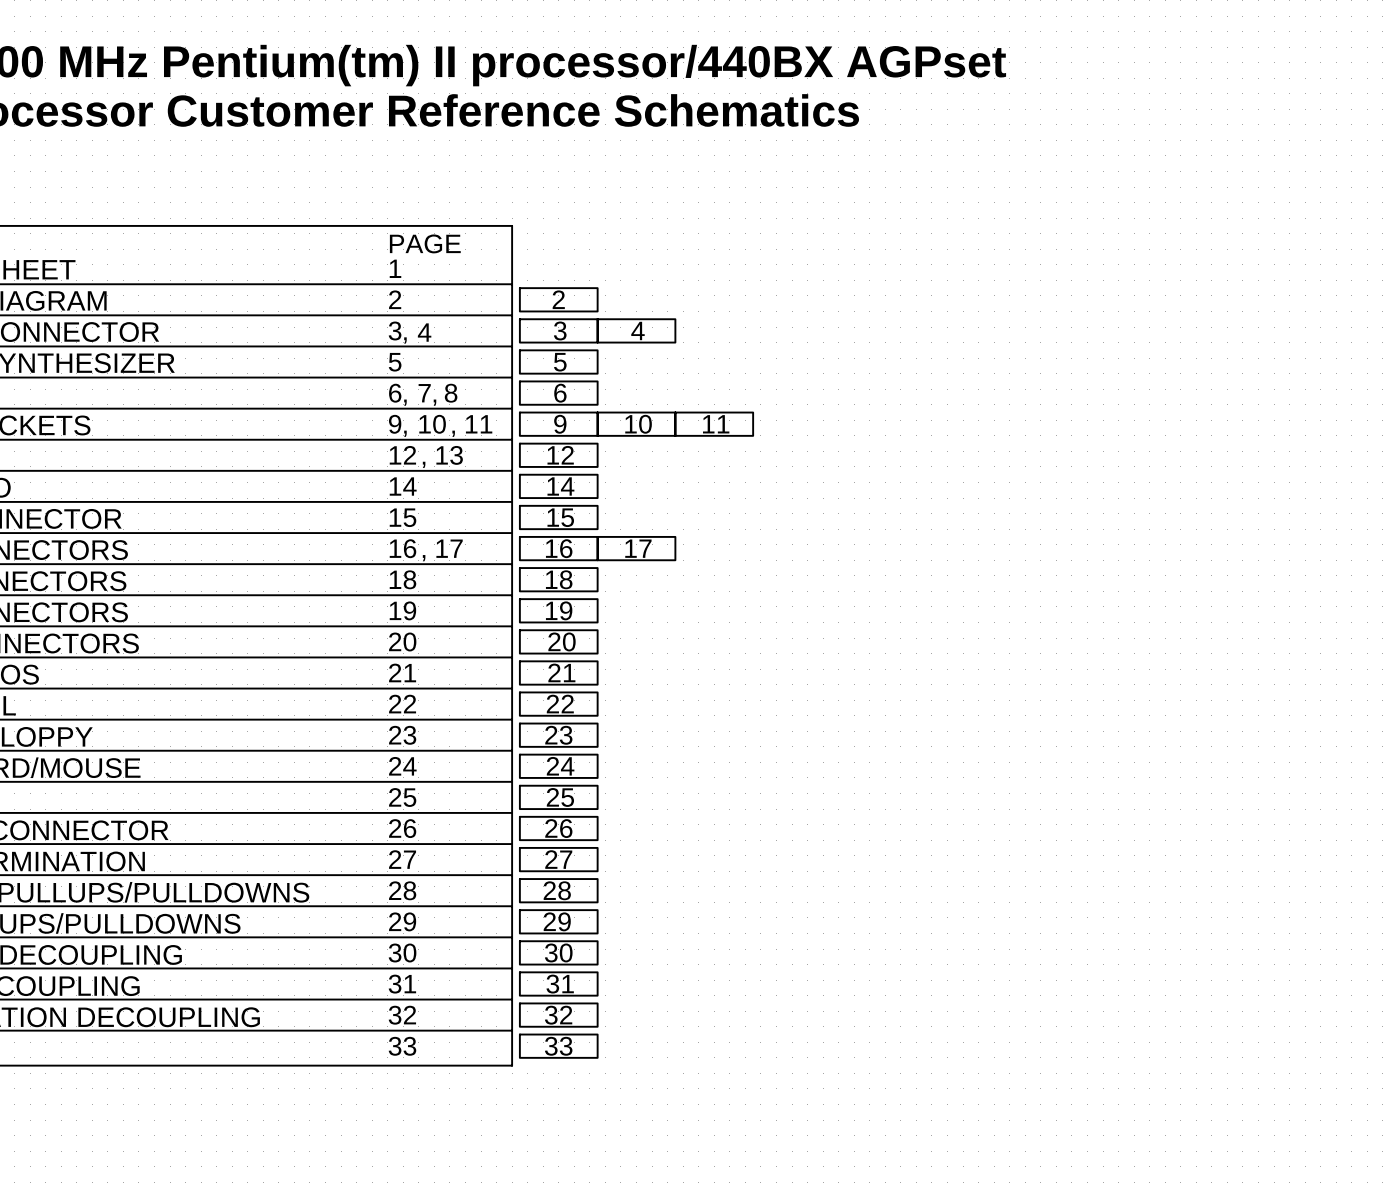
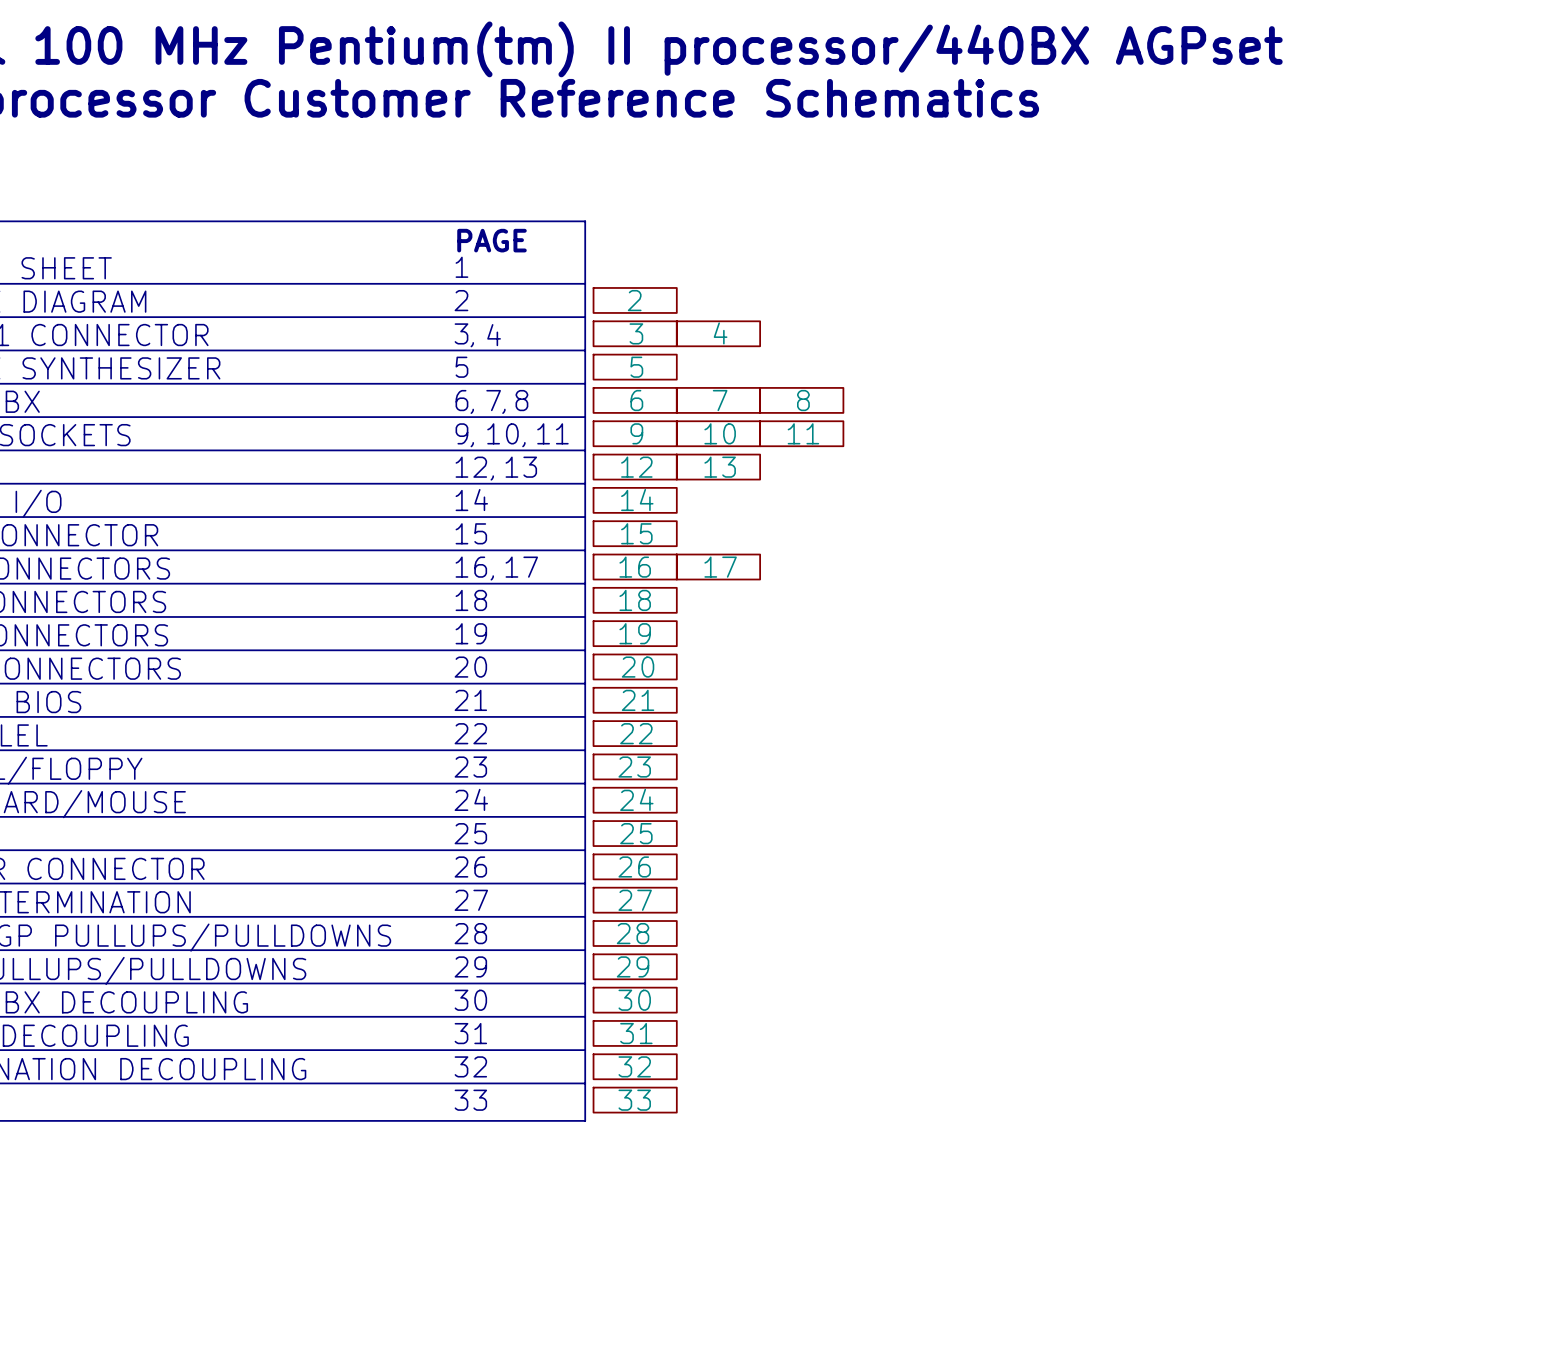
sheet: none -> (718, 400)
sheet: none -> (801, 400)
sheet: none -> (718, 467)

